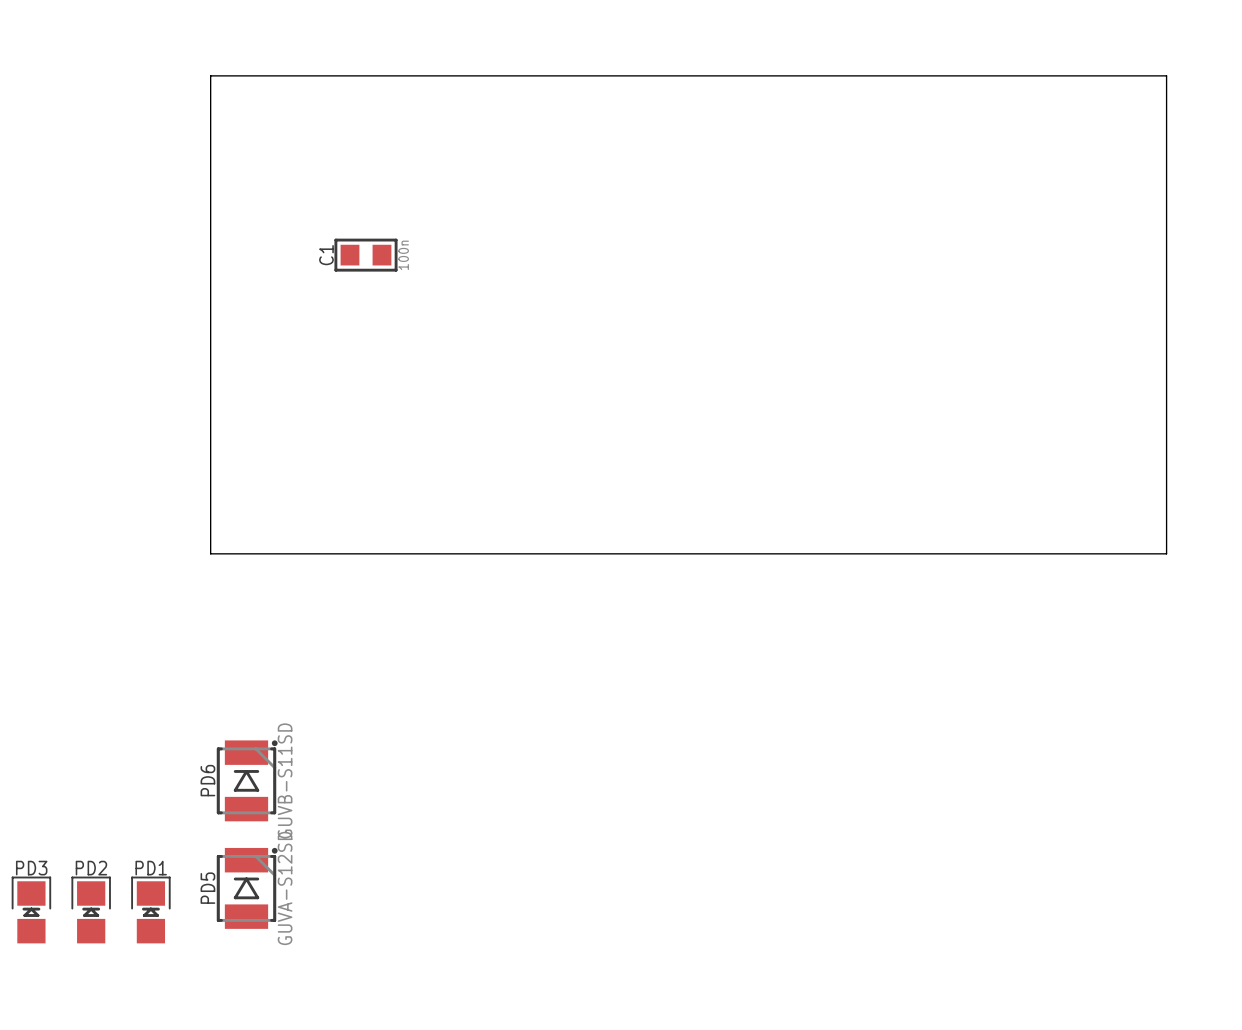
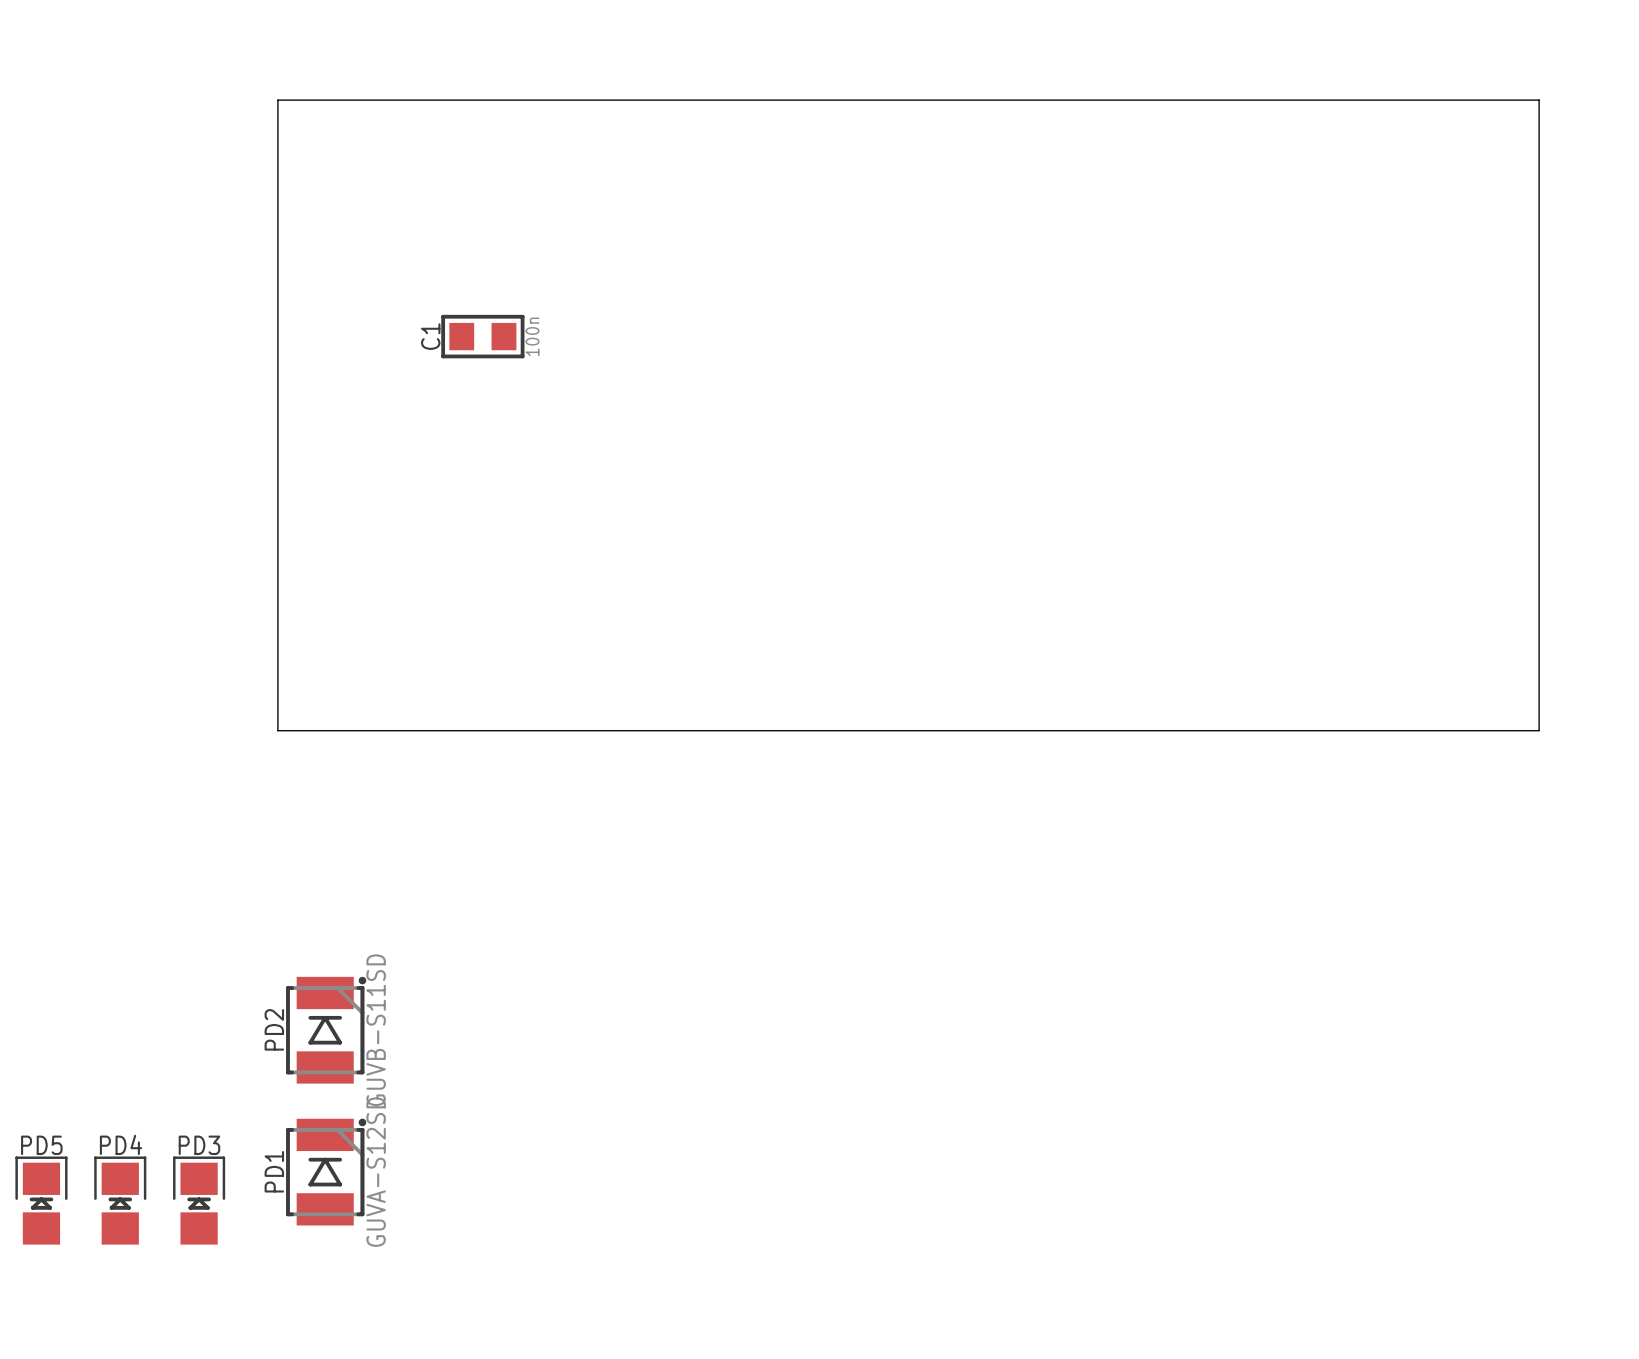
PD6 name: PD6 (207, 780) -> PD2 (274, 1029)
PD3 name: PD3 (31, 868) -> PD5 (41, 1145)
PD2 name: PD2 (91, 868) -> PD4 (121, 1144)
PD1 name: PD1 (151, 868) -> PD3 (199, 1145)
PD5 name: PD5 (207, 888) -> PD1 (274, 1171)

